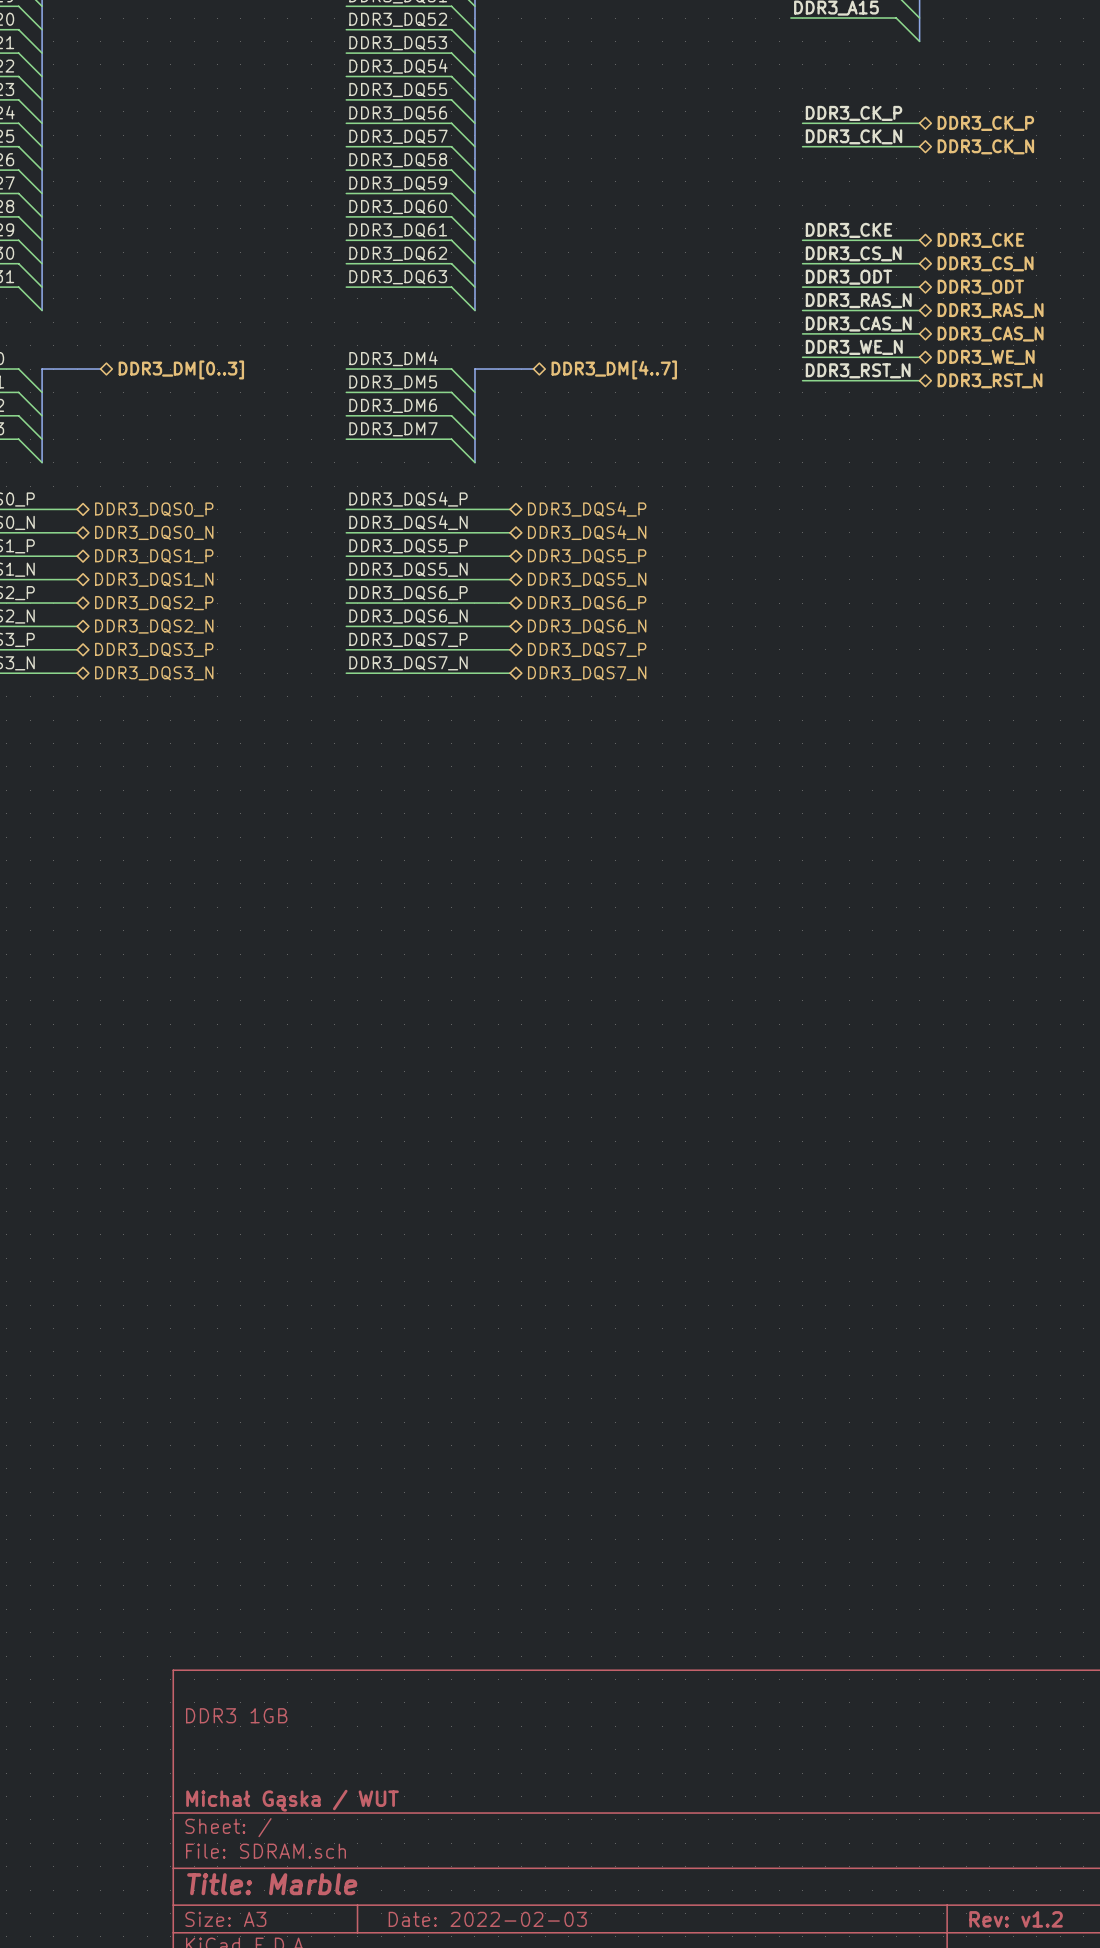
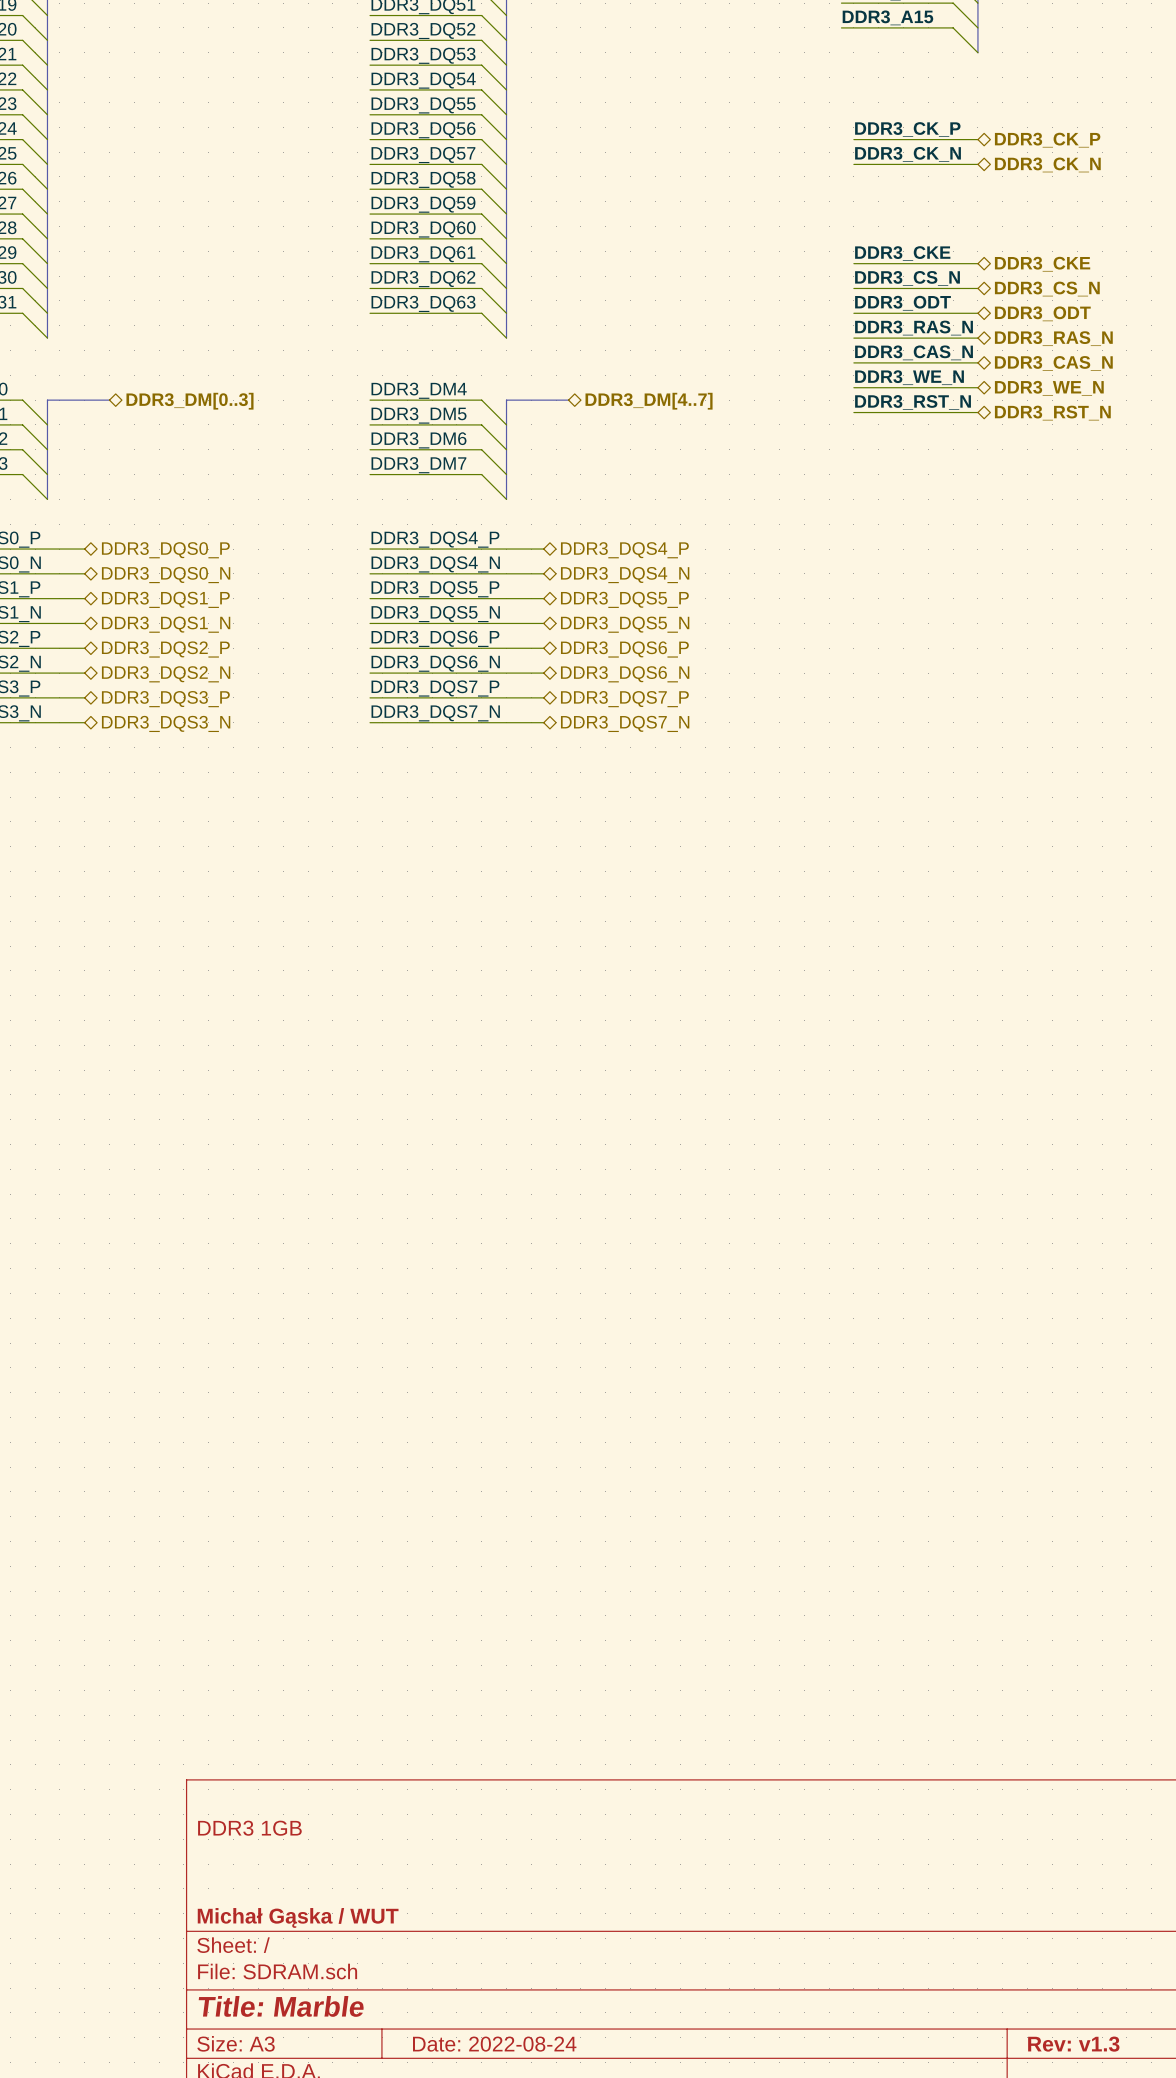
title block: Date: 2022-02-03 (487, 1919) -> Date: 2022-08-24 (494, 2044)
title block: Rev: v1.2 (1016, 1919) -> Rev: v1.3 (1073, 2044)

